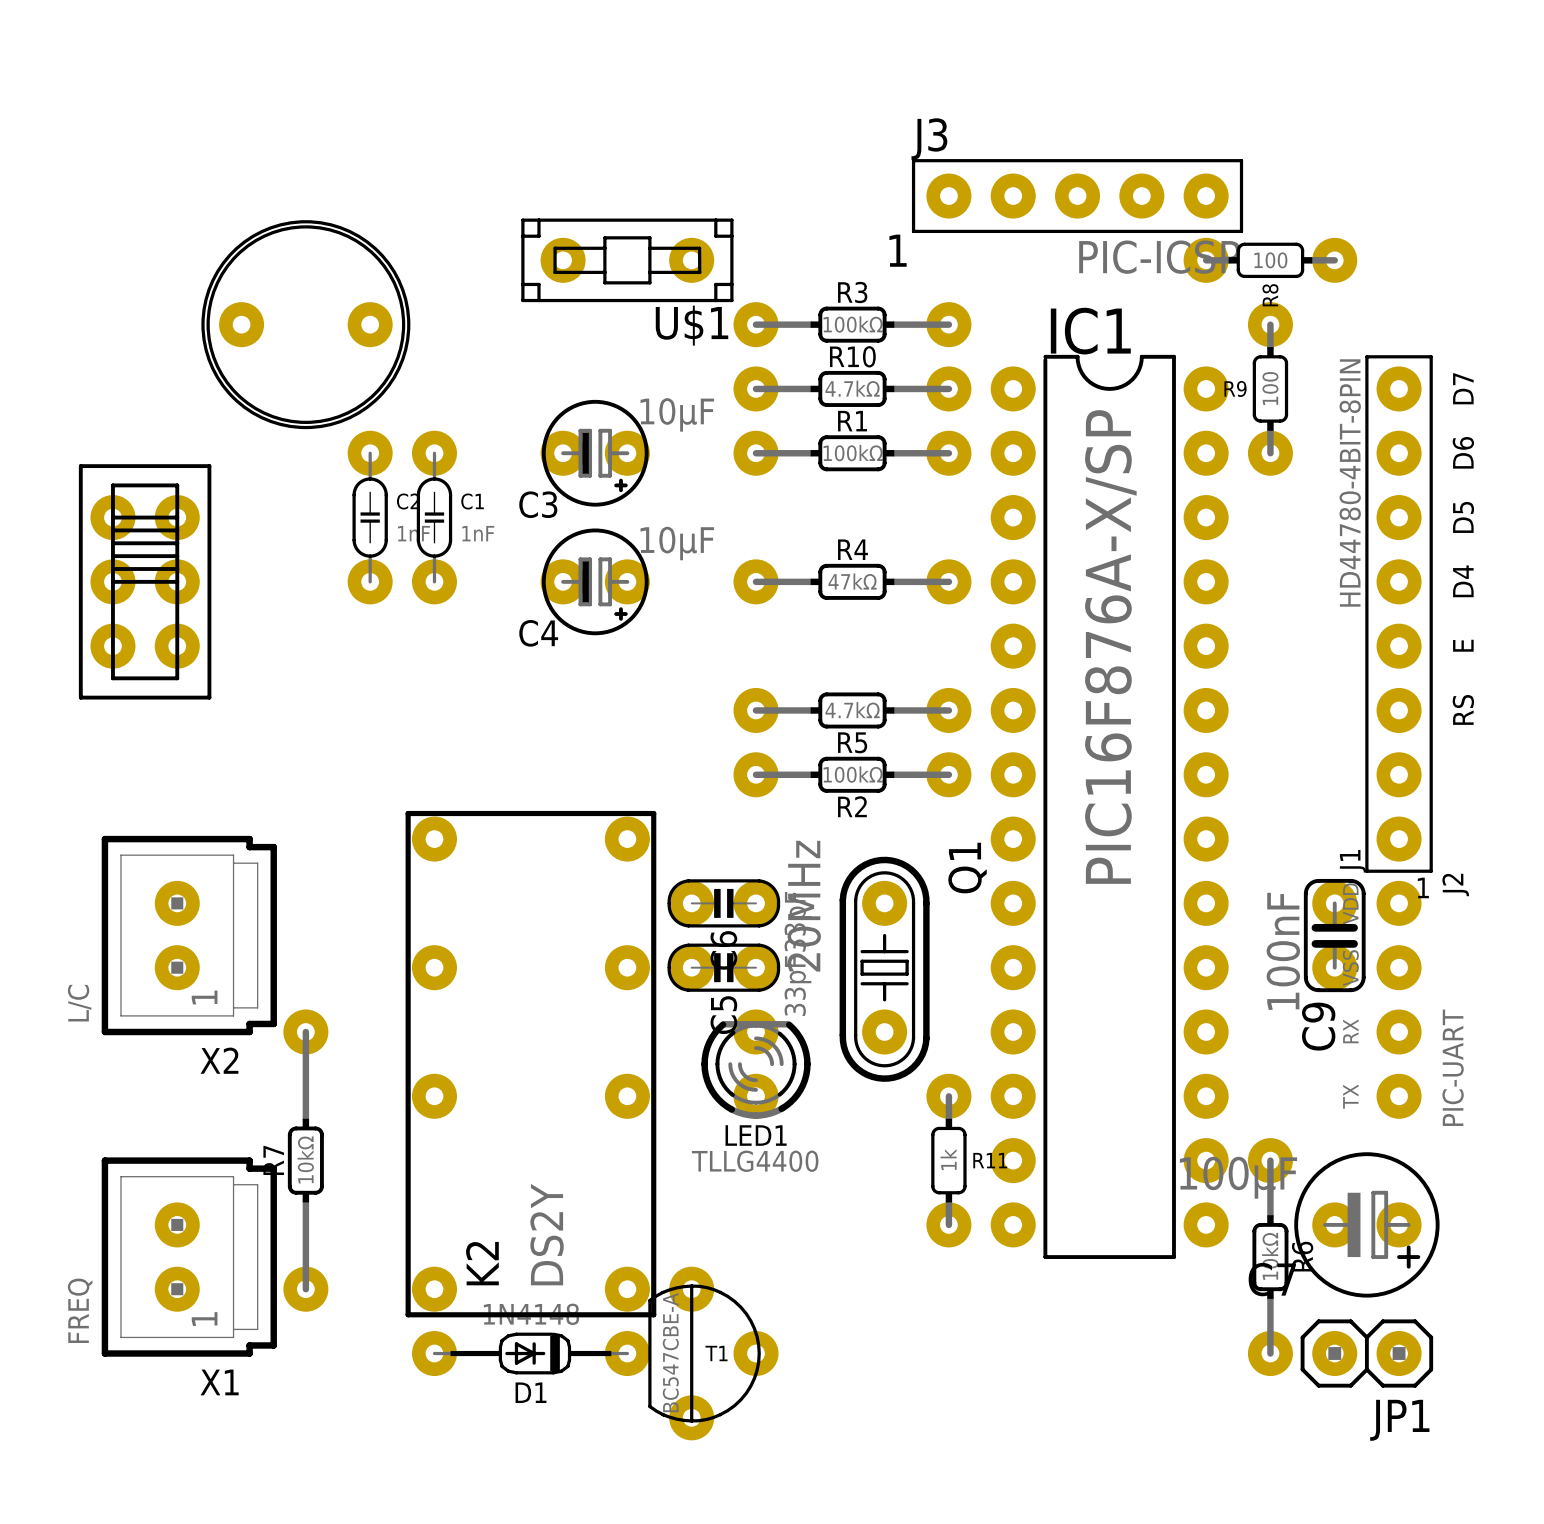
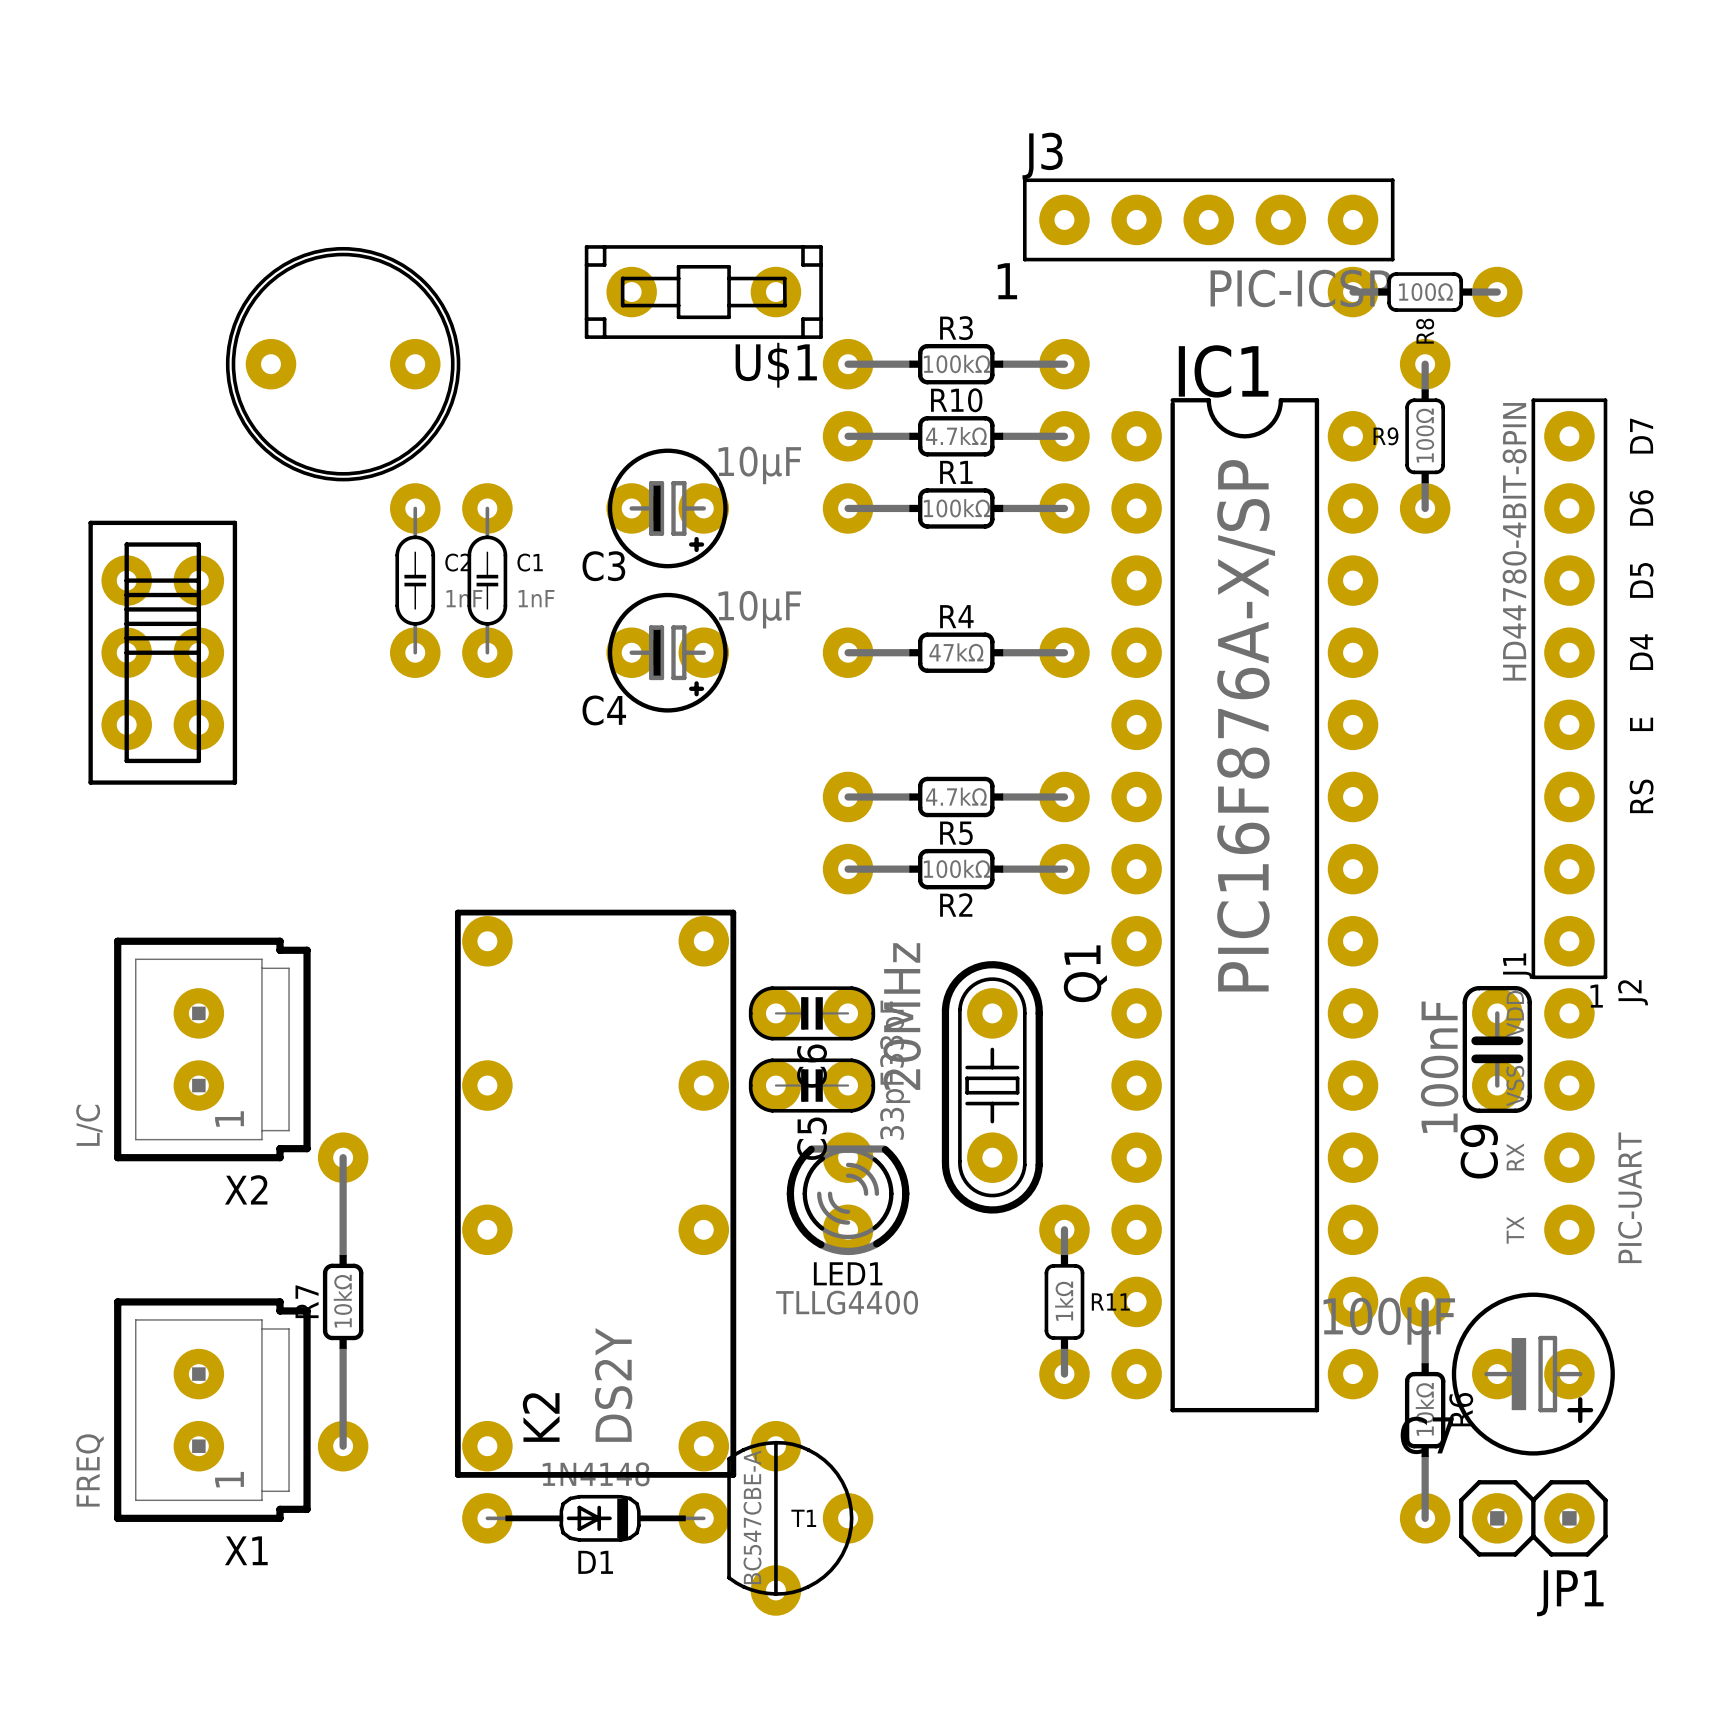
R8 value: 100 (1270, 260) -> 100Ω (1425, 292)
R9 value: 100 (1270, 388) -> 100Ω (1425, 435)
R11 value: 1k (948, 1159) -> 1kΩ (1064, 1301)

